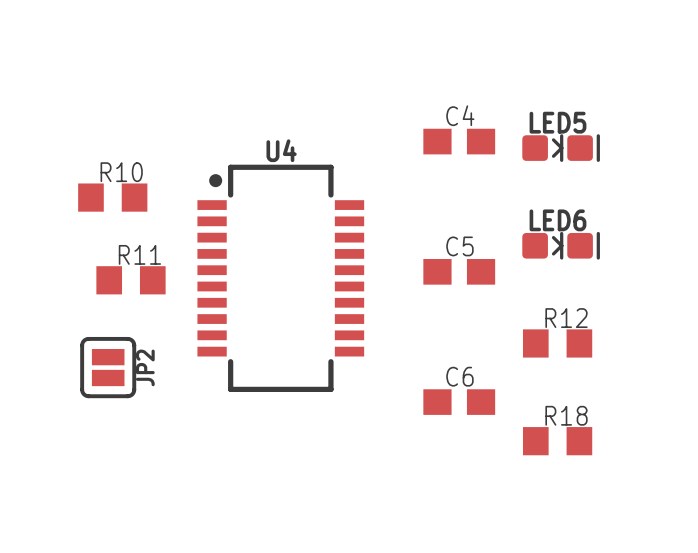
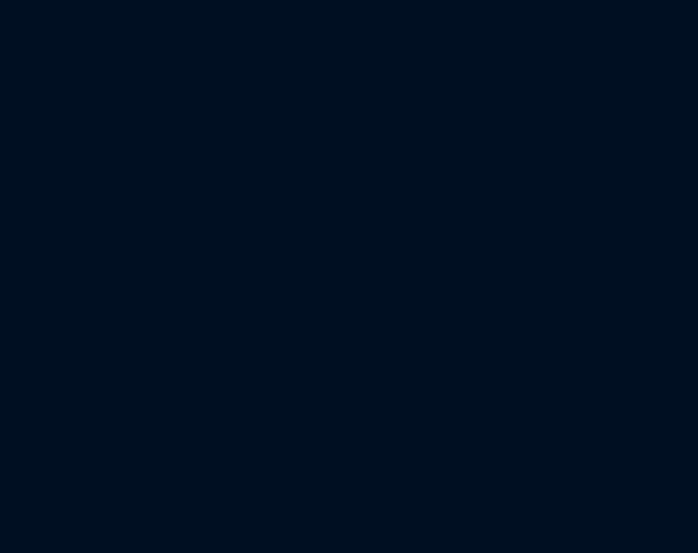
C4: (459, 141) -> none
LED5: (561, 148) -> none
R10: (112, 197) -> none
LED6: (561, 245) -> none
C5: (459, 271) -> none
U4: (280, 278) -> none
R11: (130, 280) -> none
R12: (557, 343) -> none
JP2: (108, 367) -> none
C6: (459, 402) -> none
R18: (557, 441) -> none

